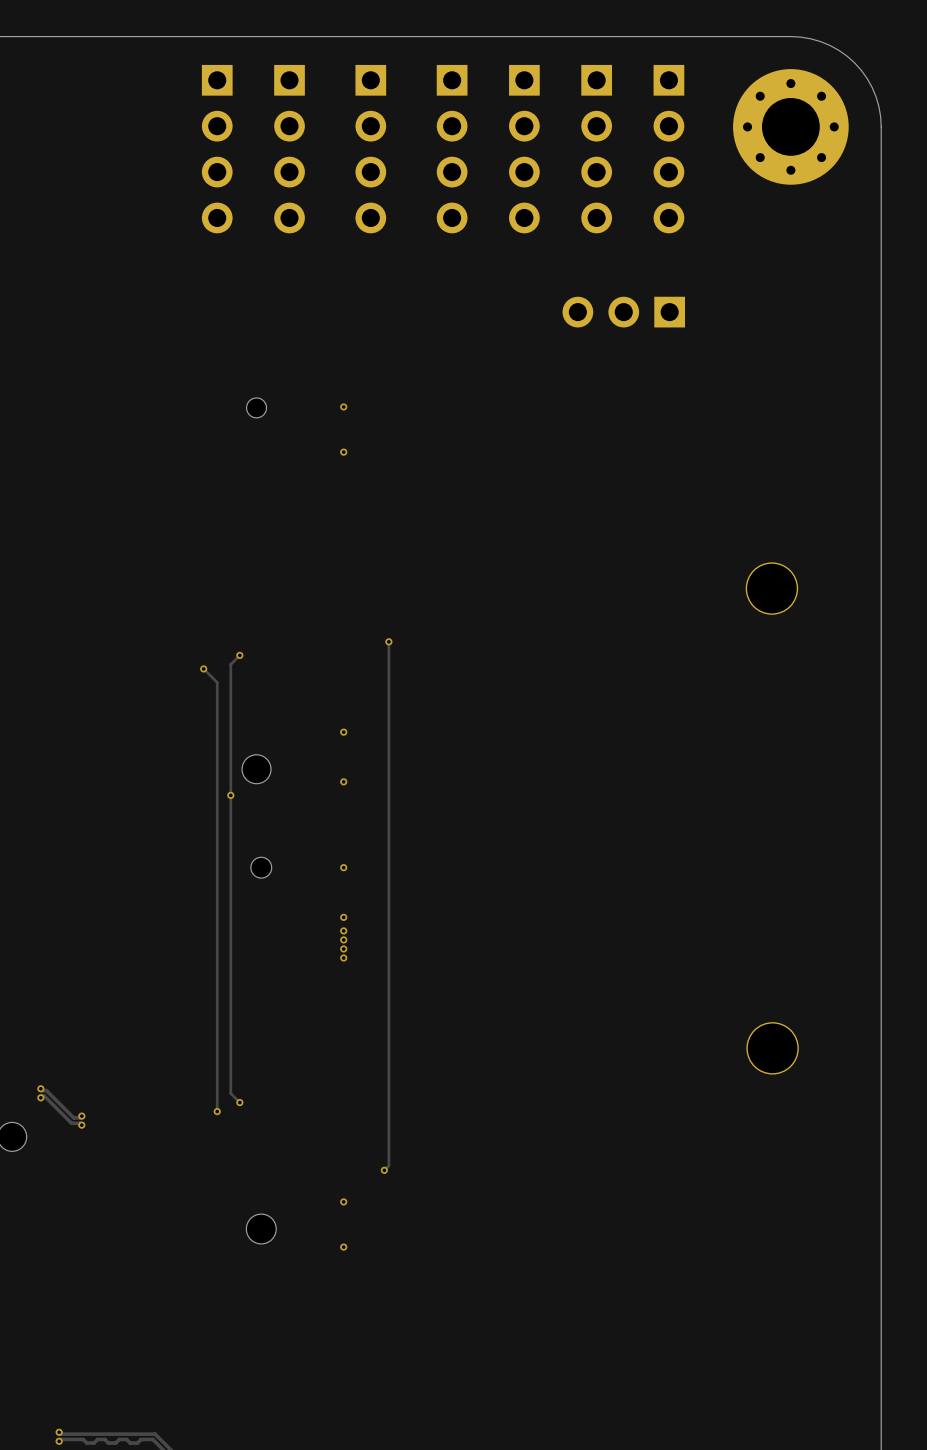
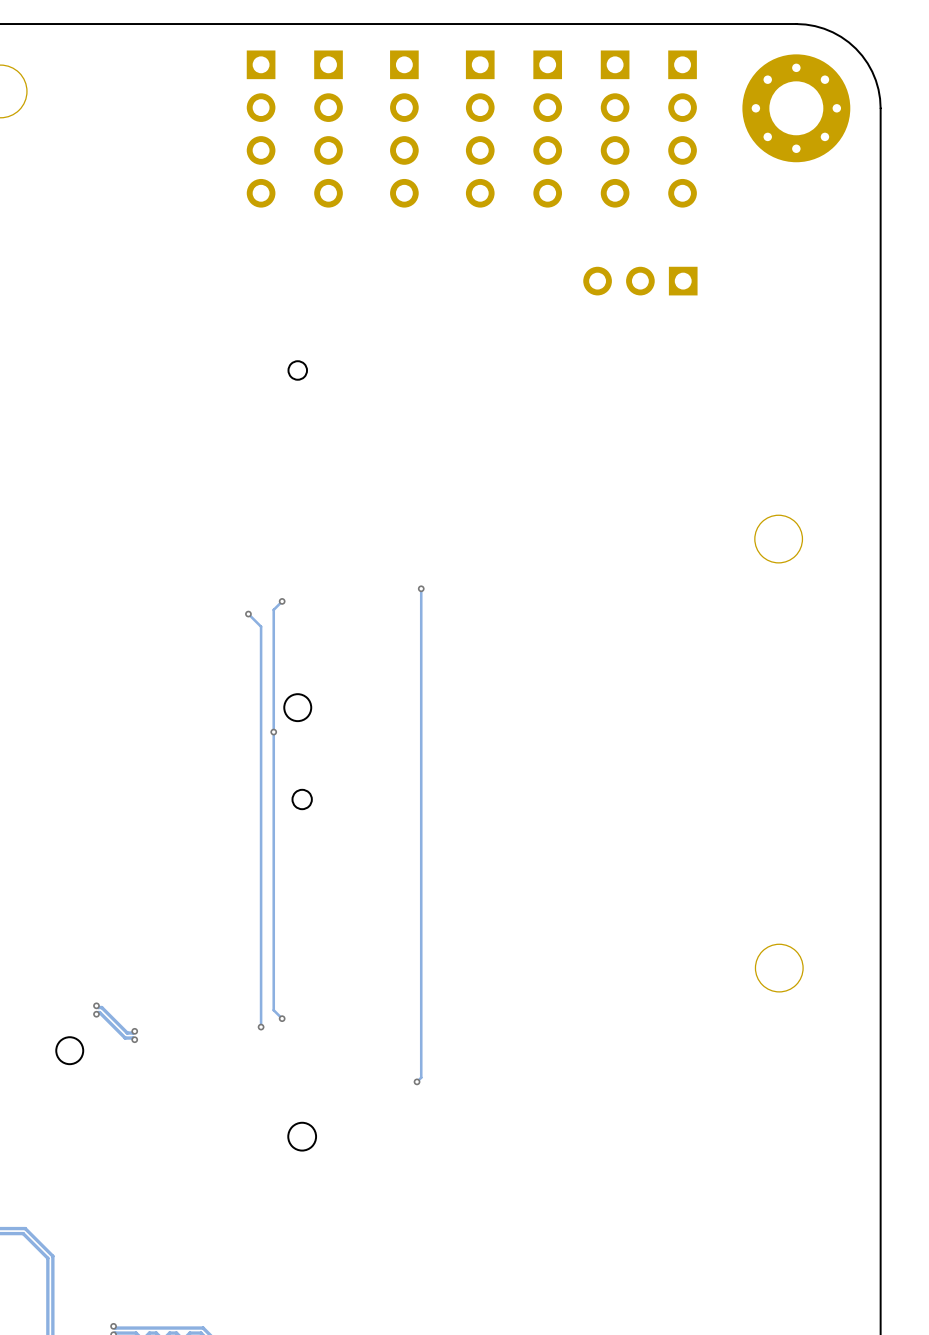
via: (343, 406) -> none
via: (343, 452) -> none
via: (343, 732) -> none
via: (343, 781) -> none
via: (343, 867) -> none
via: (343, 917) -> none
via: (343, 930) -> none
via: (343, 939) -> none
via: (343, 948) -> none
via: (343, 958) -> none
via: (343, 1201) -> none
via: (343, 1247) -> none

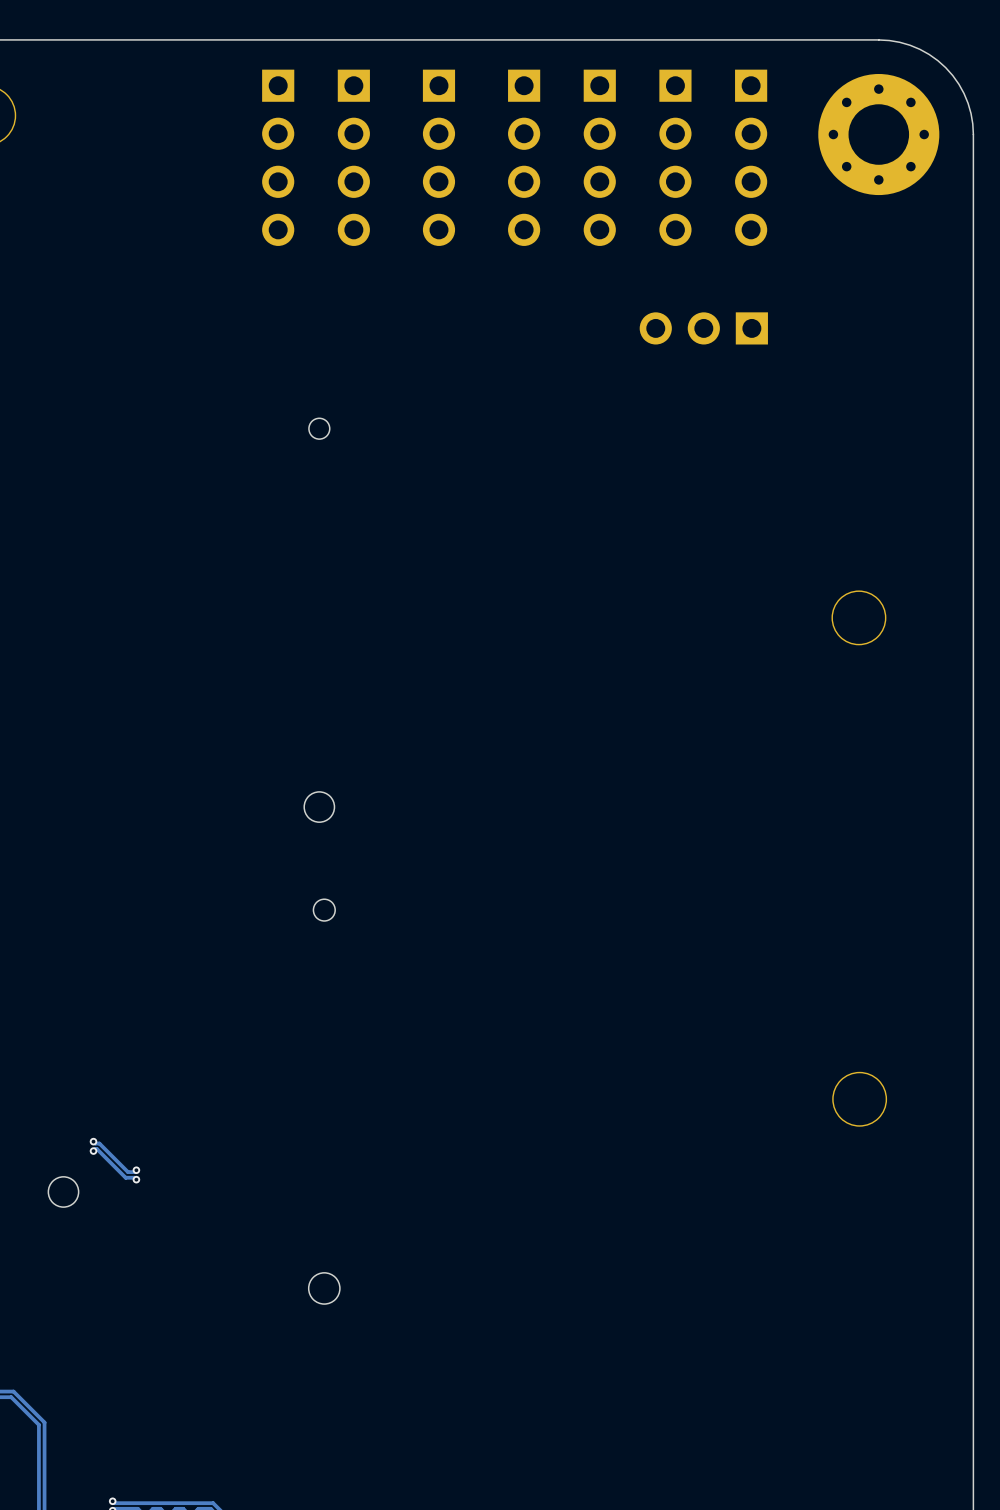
track: (421, 588) (421, 1077) (417, 1081) -> none
via: (421, 588) -> none
track: (282, 601) (273, 609) (273, 1010) (282, 1018) -> none
via: (282, 601) -> none
track: (248, 614) (261, 626) (261, 1027) -> none
via: (248, 614) -> none
via: (273, 732) -> none
via: (282, 1018) -> none
via: (261, 1027) -> none
via: (417, 1081) -> none

